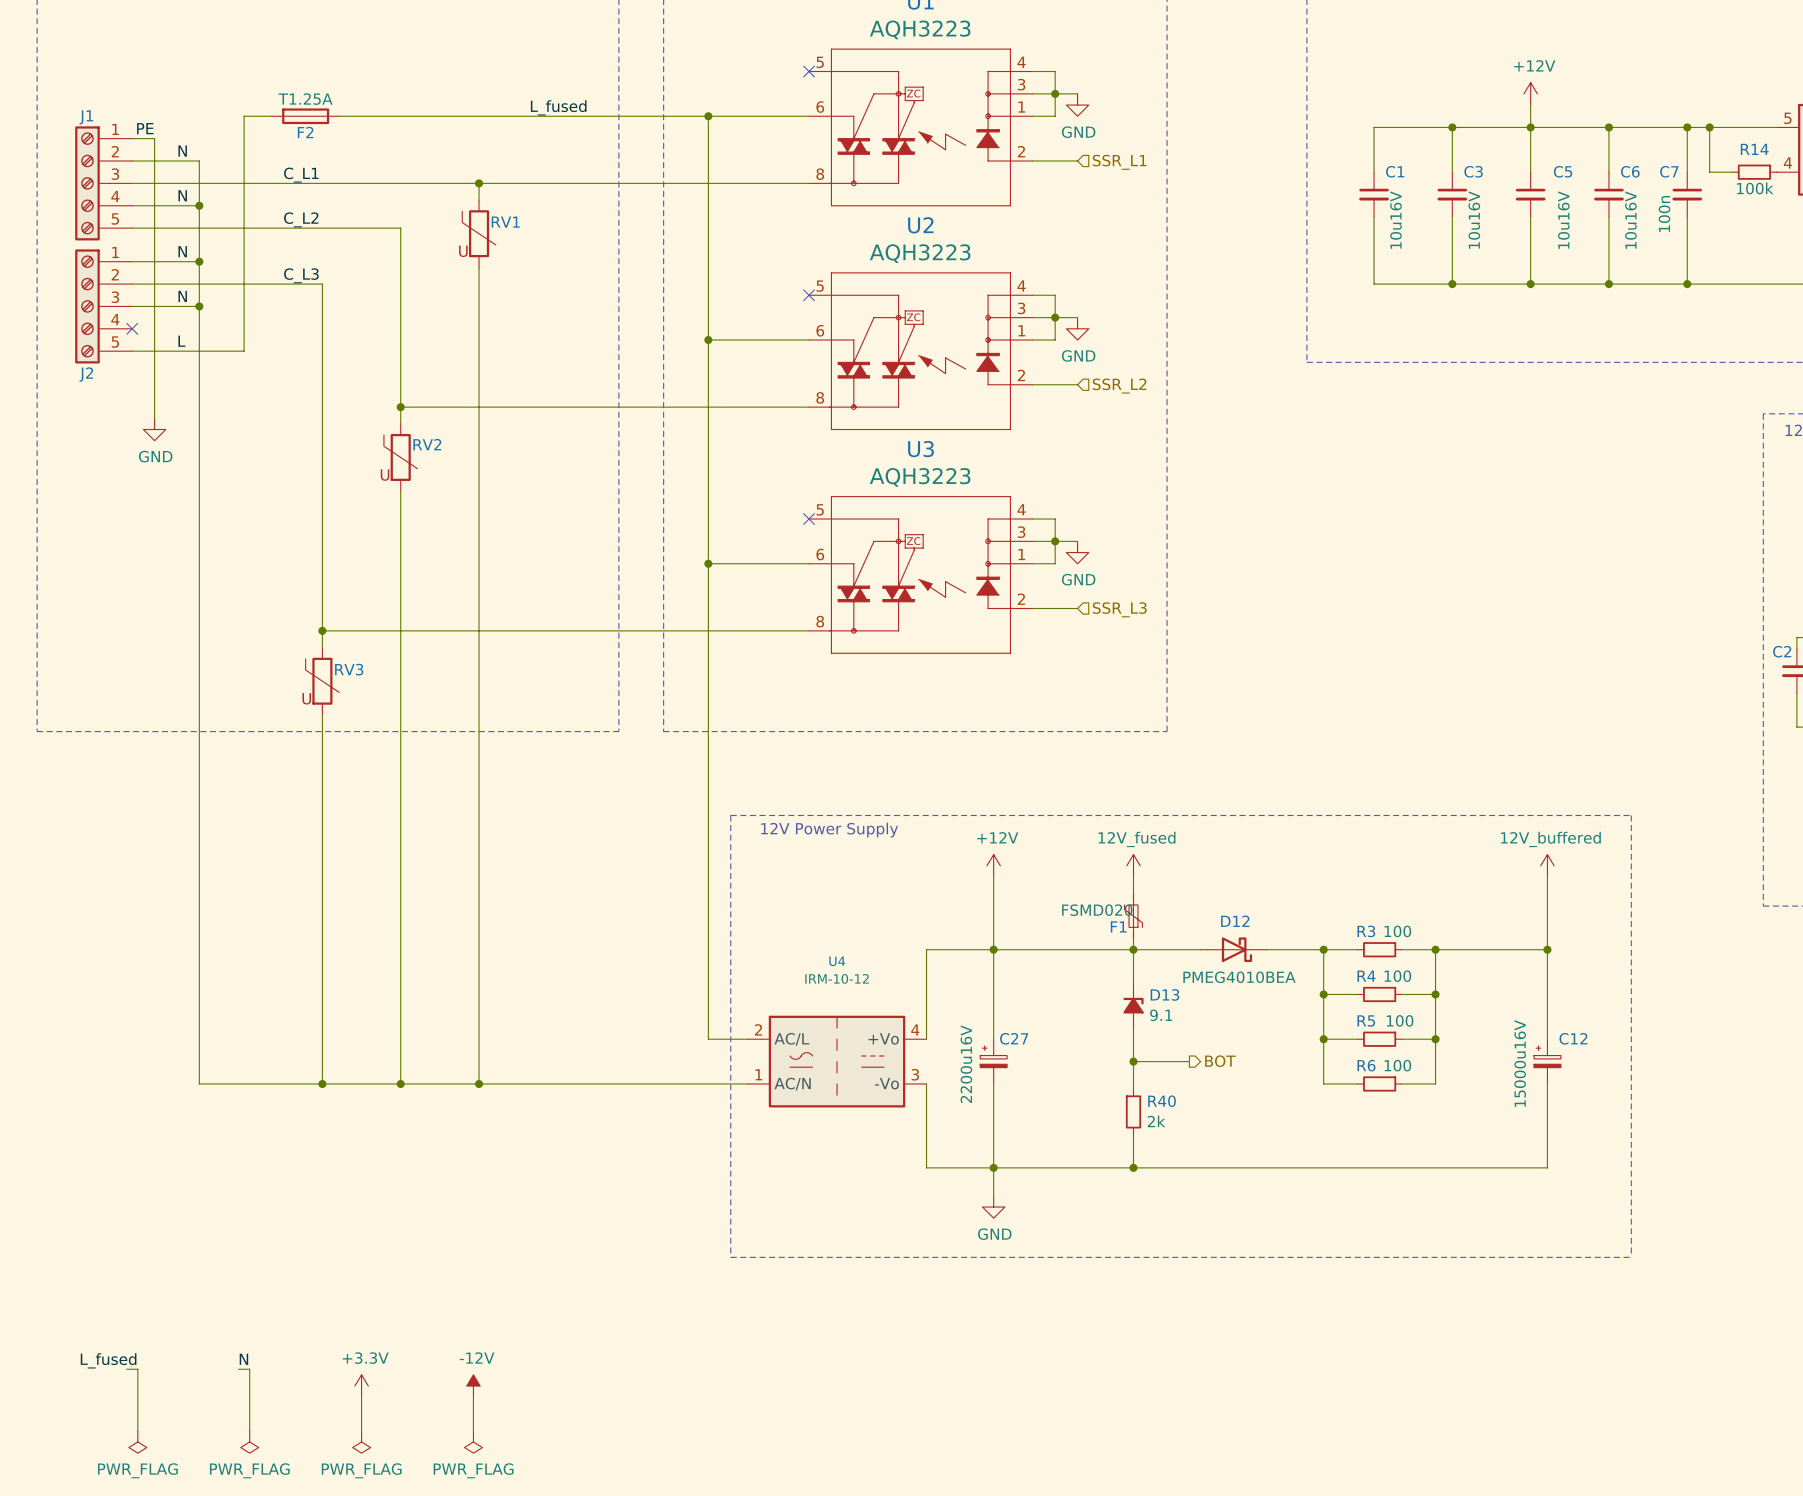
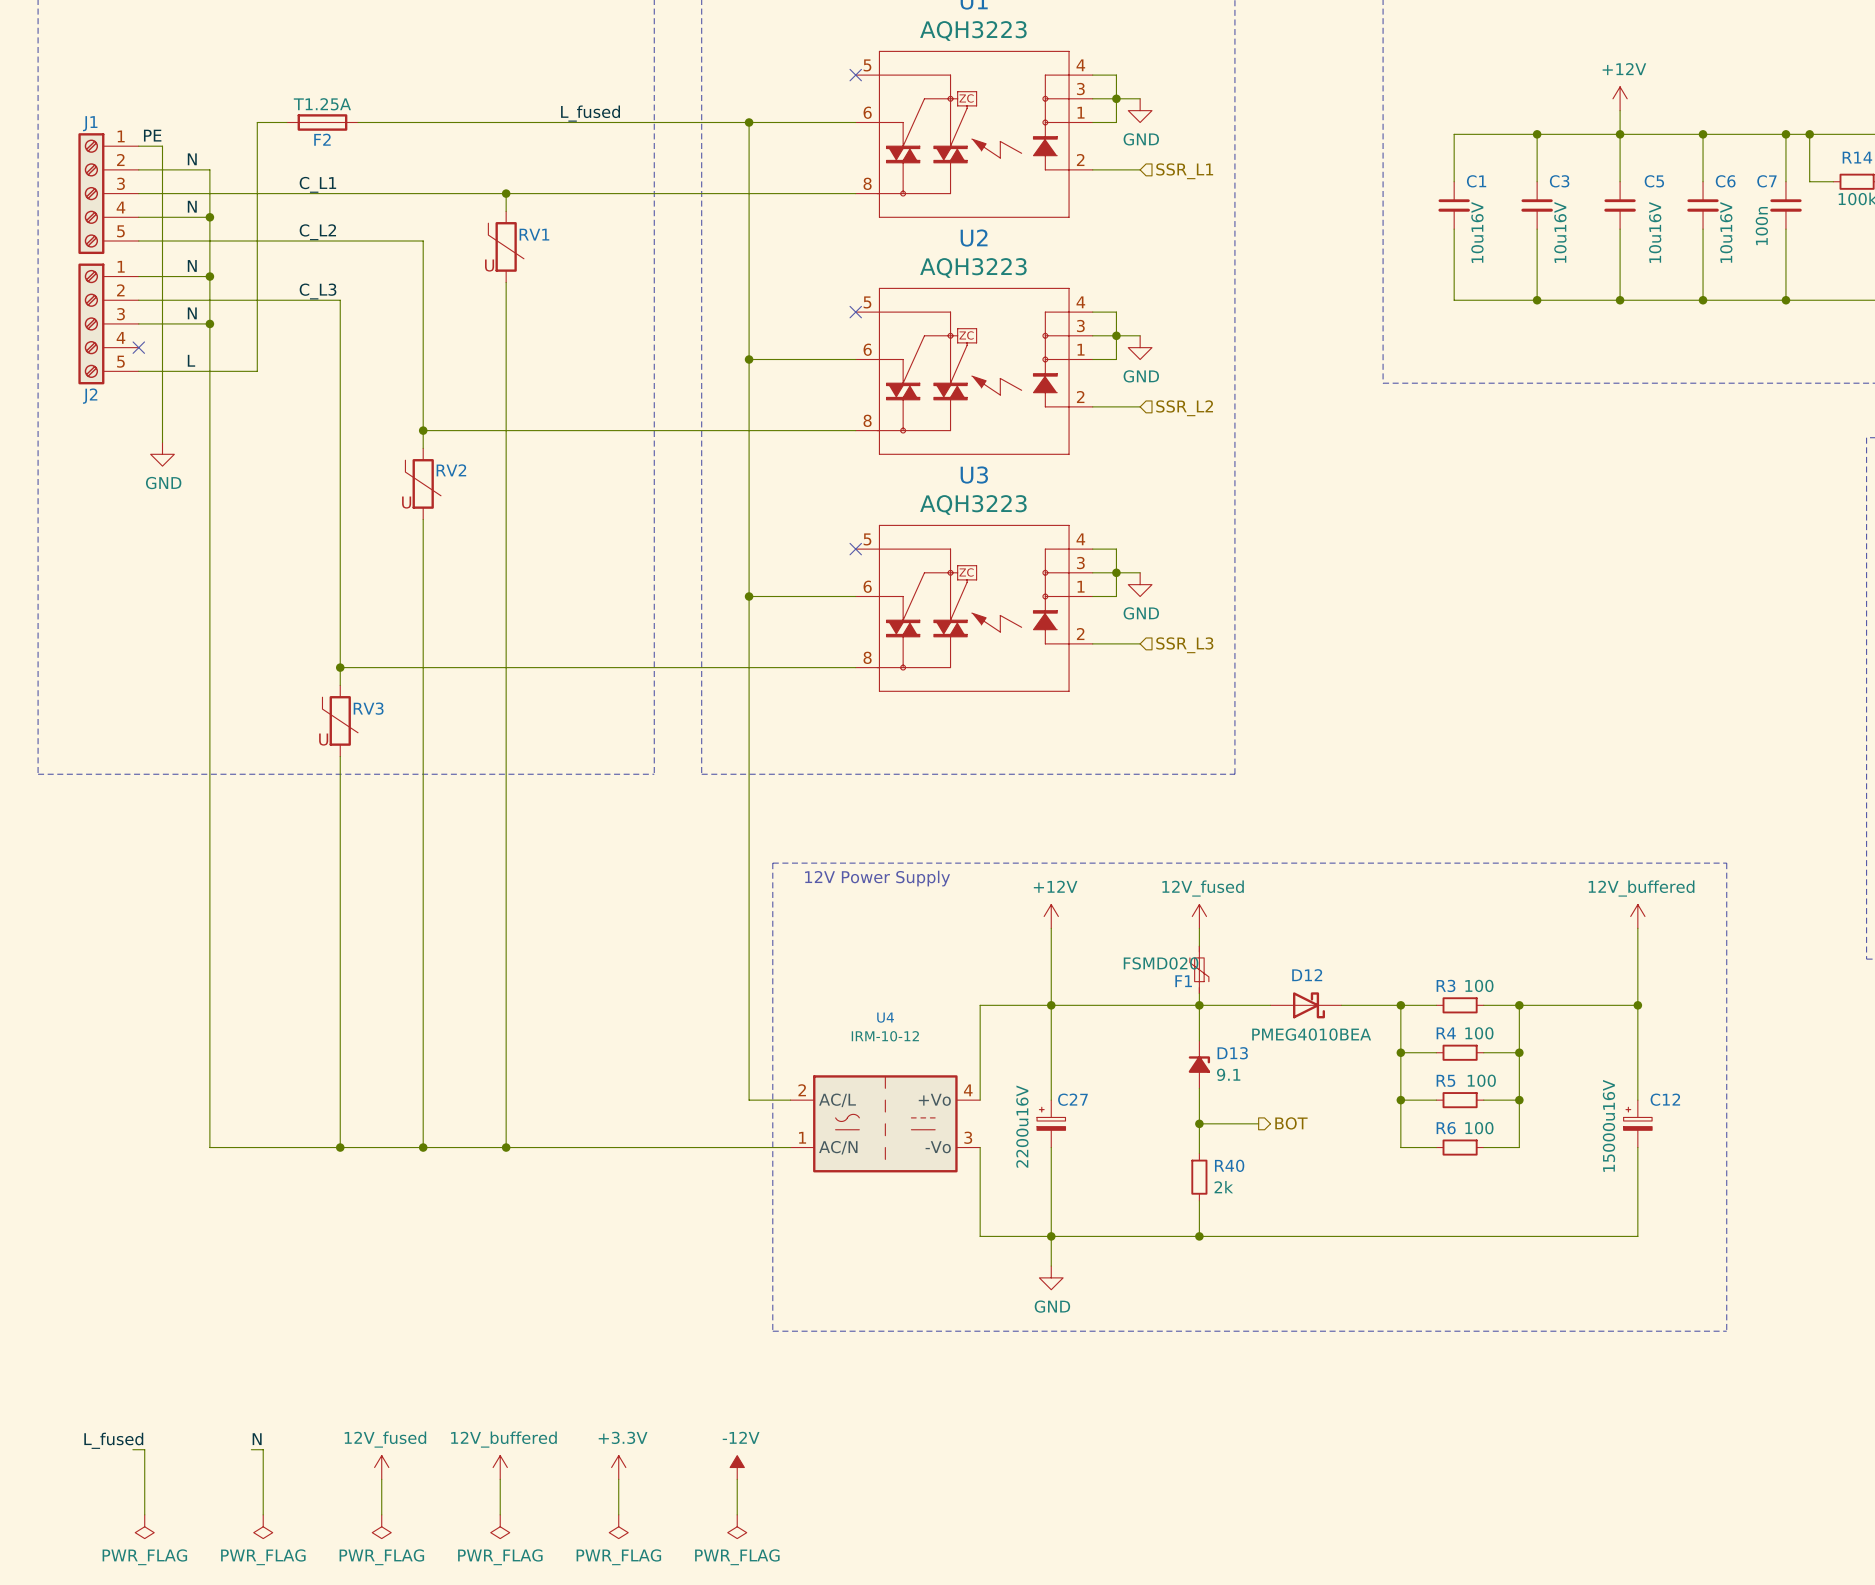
power symbol: +3.3V (361, 1386) -> 12V_fused (381, 1467)
power symbol: -12V (473, 1386) -> 12V_buffered (500, 1467)
power symbol: none -> +3.3V (618, 1467)
power symbol: none -> -12V (737, 1467)
wire: none -> (618, 1479) (618, 1514)
wire: none -> (737, 1479) (737, 1514)
power symbol: none -> PWR_FLAG (618, 1526)
power symbol: none -> PWR_FLAG (737, 1526)

